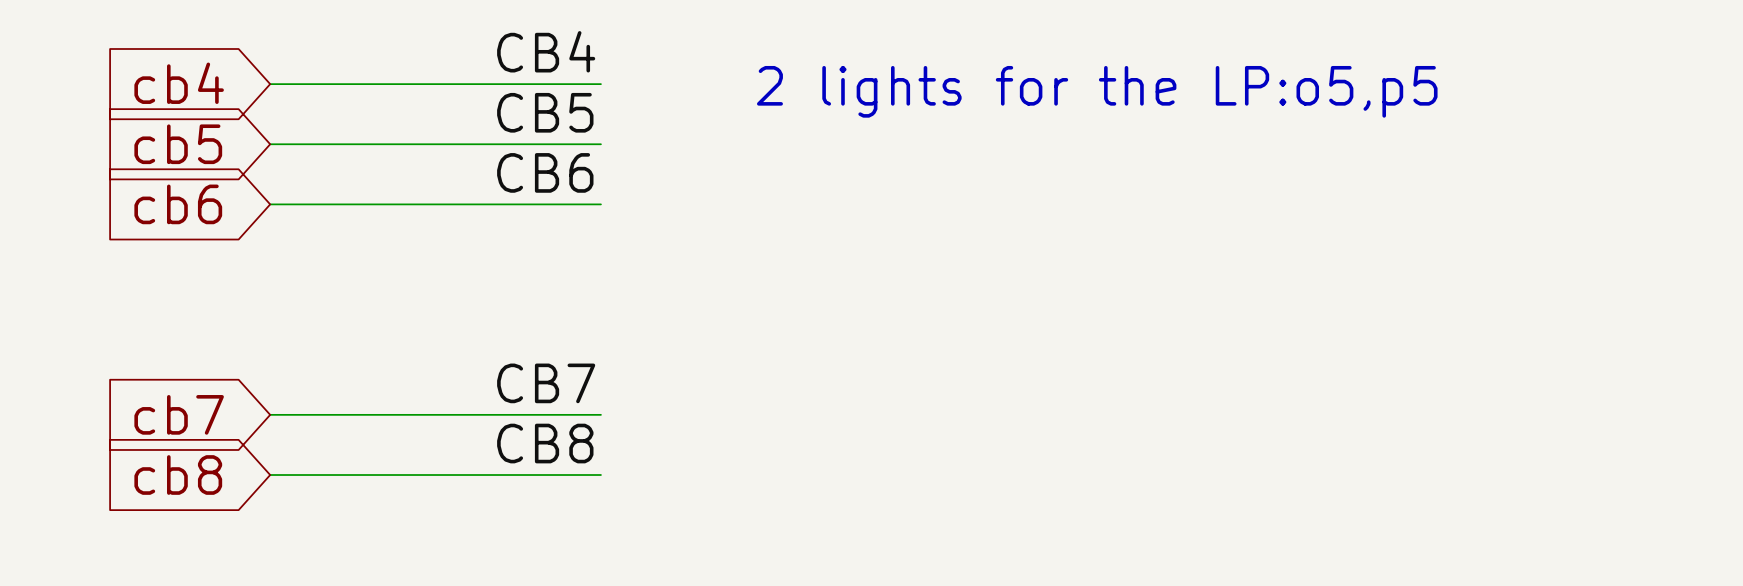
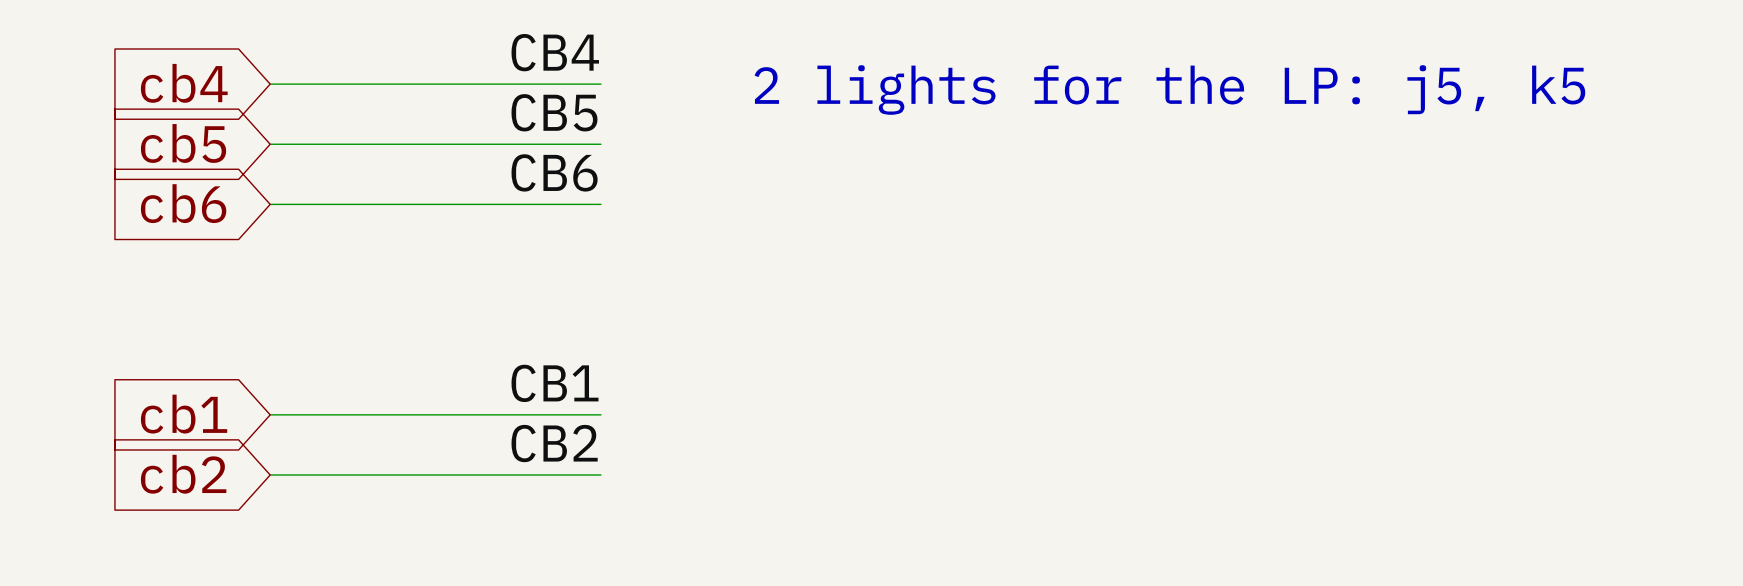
text: 2 lights for the LP:o5,p5 (1097, 91) -> 2 lights for the LP: j5, k5 (1169, 90)
label: CB7 (546, 383) -> CB1 (555, 383)
global label: cb7 (179, 414) -> cb1 (184, 414)
label: CB8 (545, 443) -> CB2 (554, 443)
global label: cb8 (178, 475) -> cb2 (183, 474)

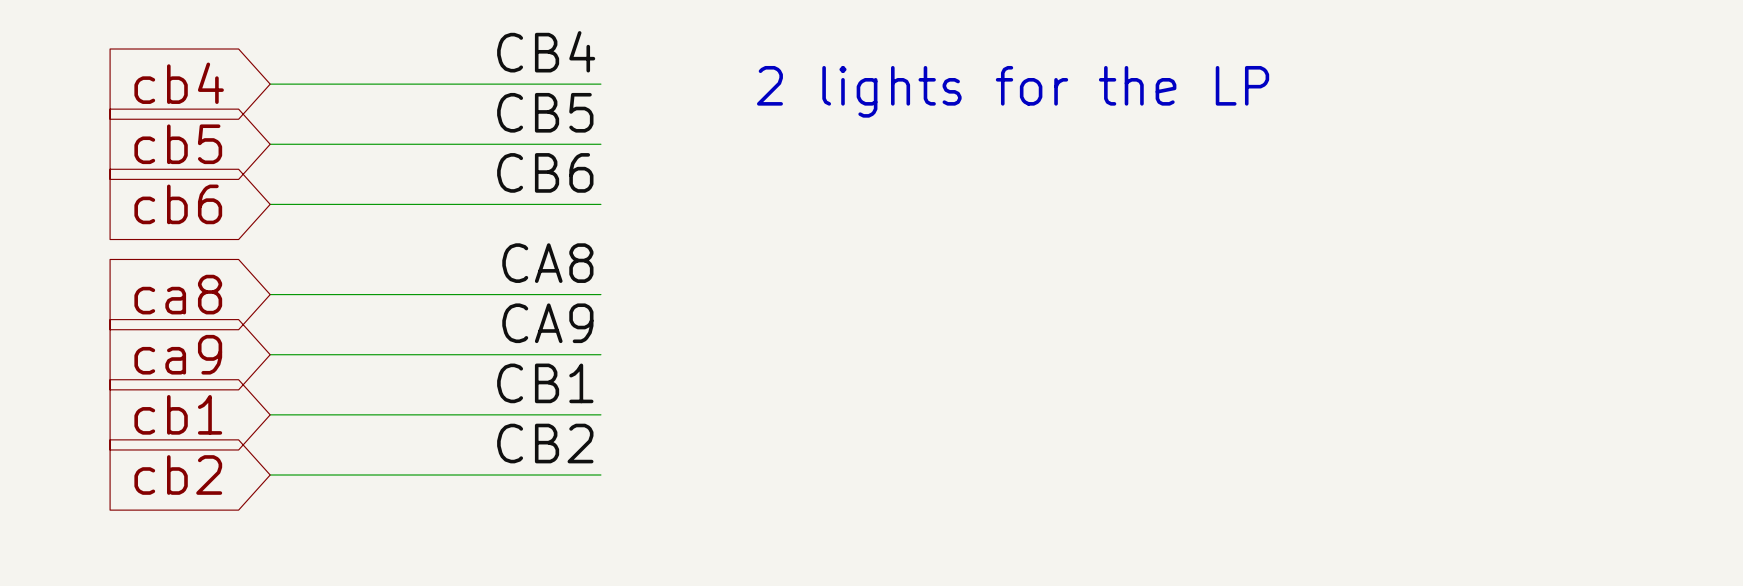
text: 2 lights for the LP: j5, k5 (1169, 90) -> 2 lights for the LP (1013, 91)
label: none -> CA8 (547, 263)
global label: none -> ca8 (178, 294)
wire: none -> (270, 294) (600, 294)
label: none -> CA9 (547, 323)
global label: none -> ca9 (178, 354)
wire: none -> (270, 354) (600, 354)

